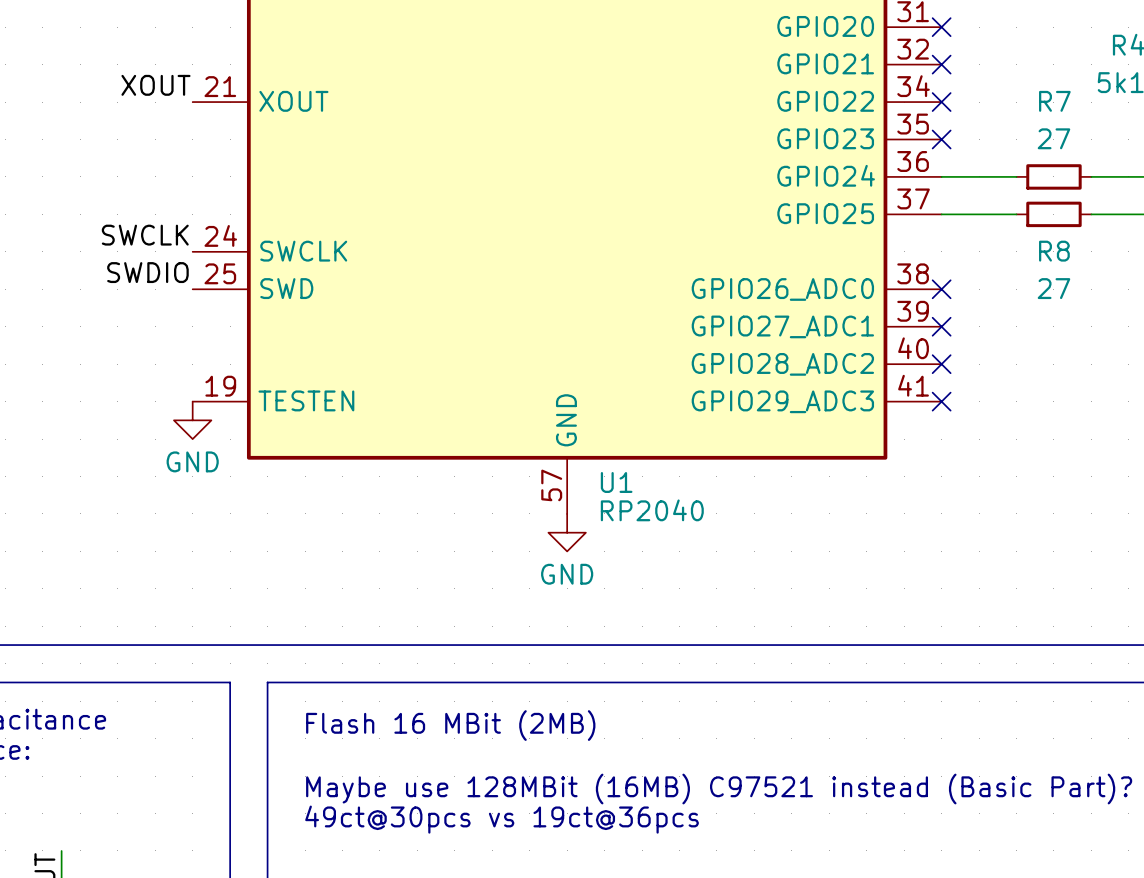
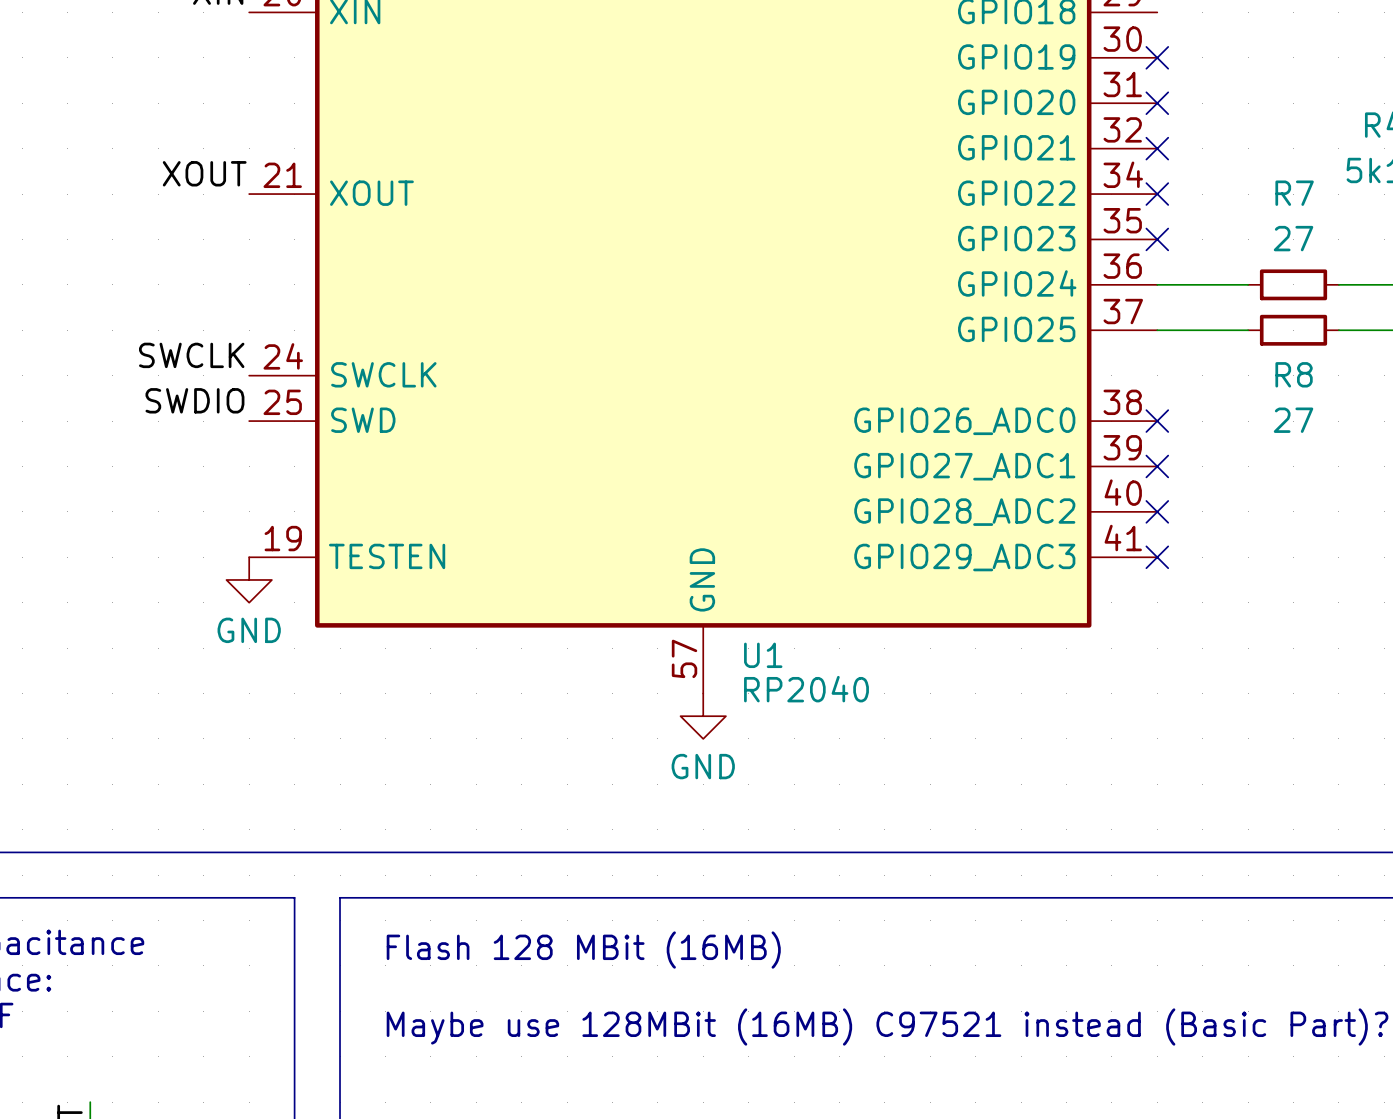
text: Flash 16 MBit (2MB) (450, 725) -> Flash 128 MBit (16MB) (583, 950)
text: 49ct@30pcs vs 19ct@36pcs (502, 819) -> none

